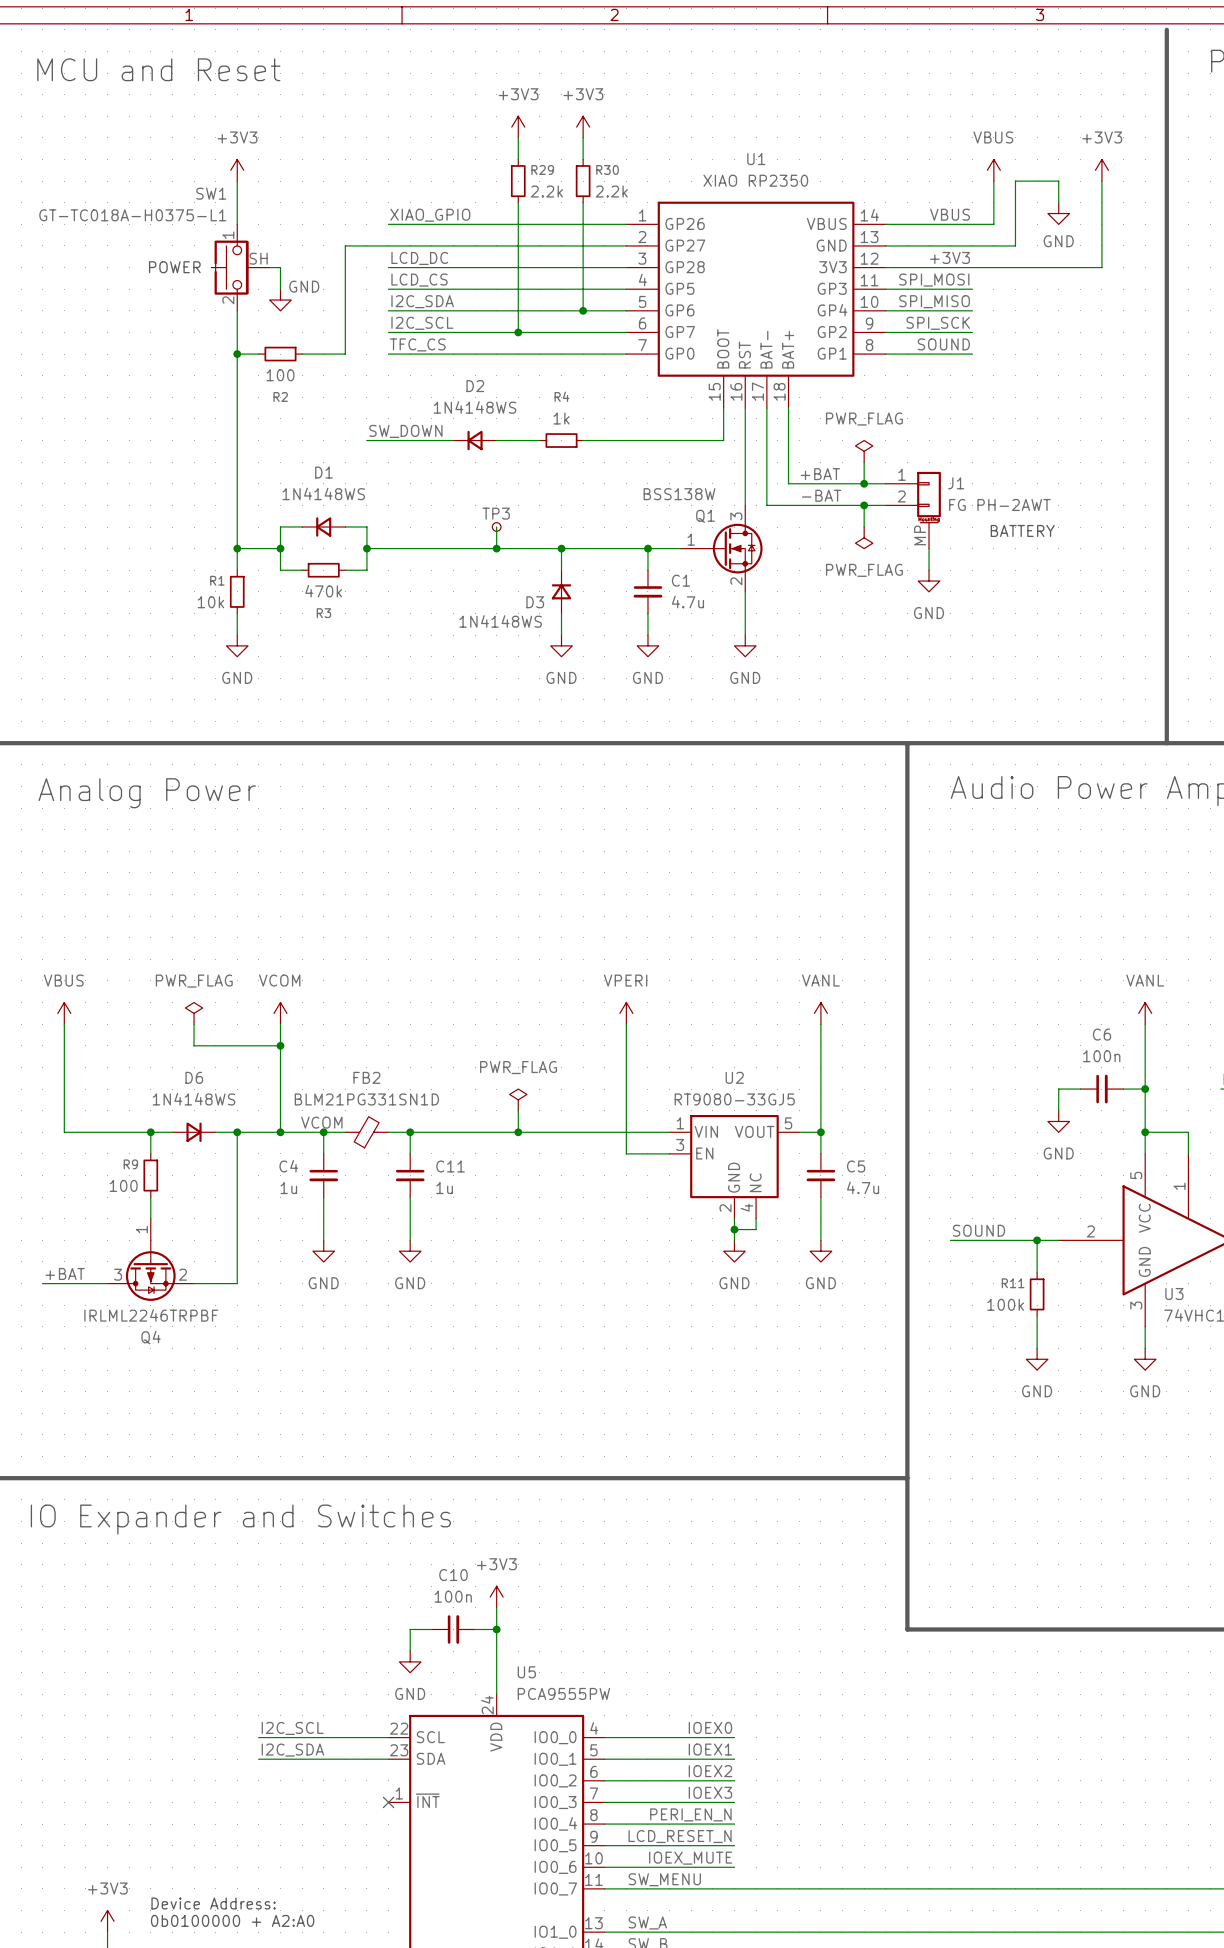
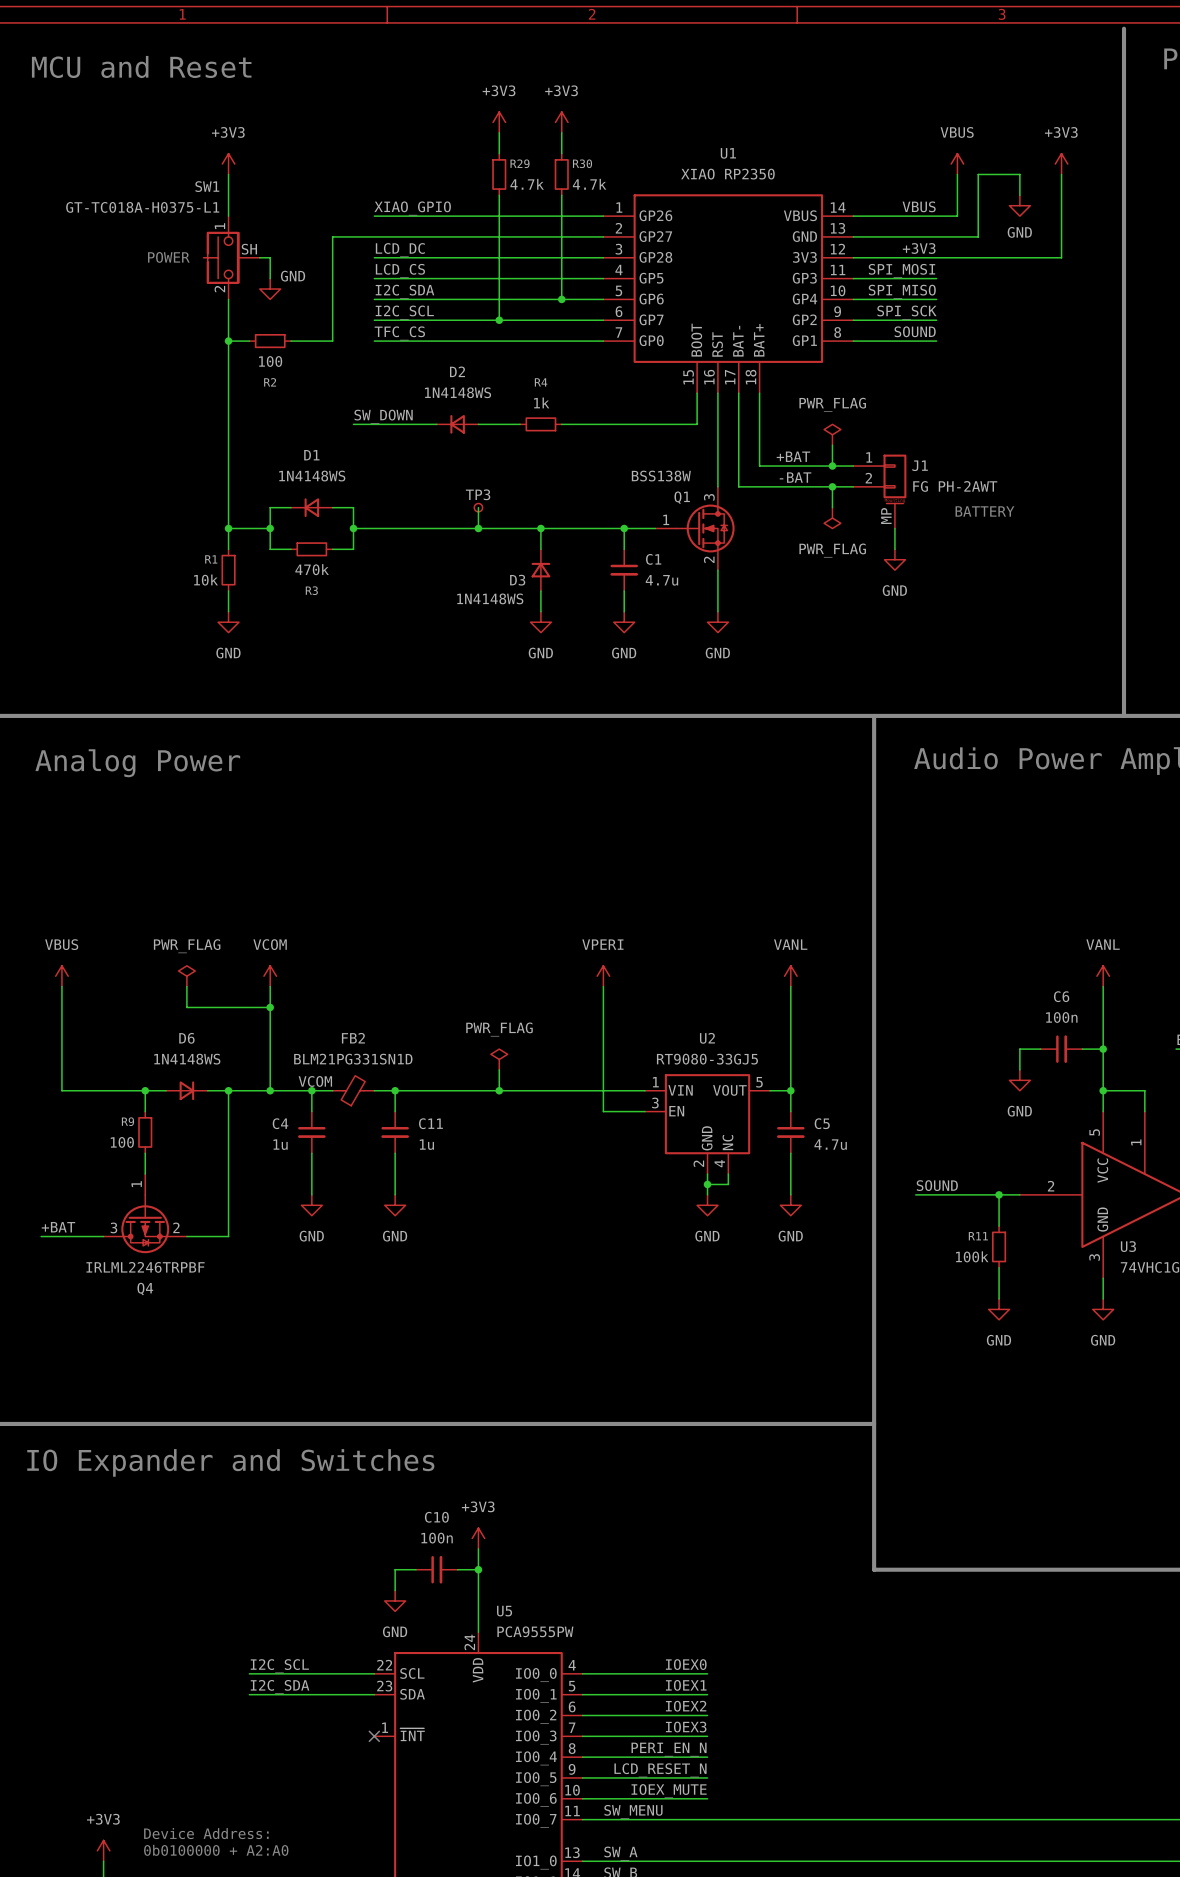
R29 value: 2.2k (546, 191) -> 4.7k (527, 184)
R30 value: 2.2k (611, 191) -> 4.7k (589, 184)

